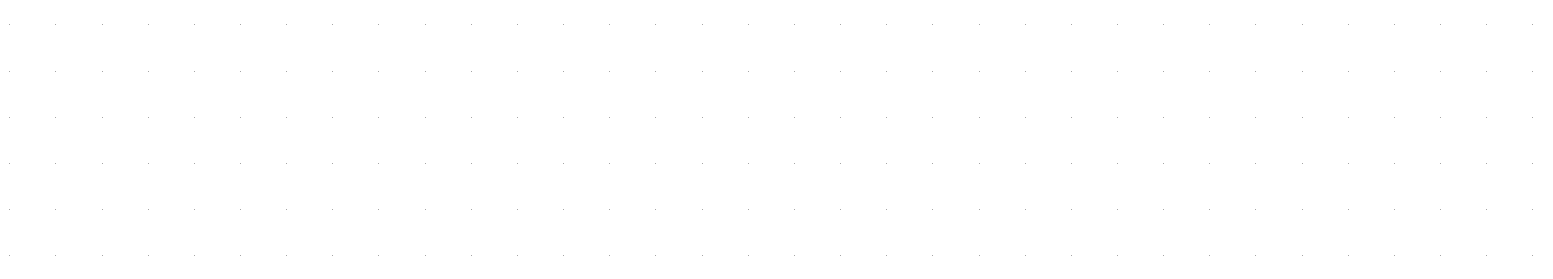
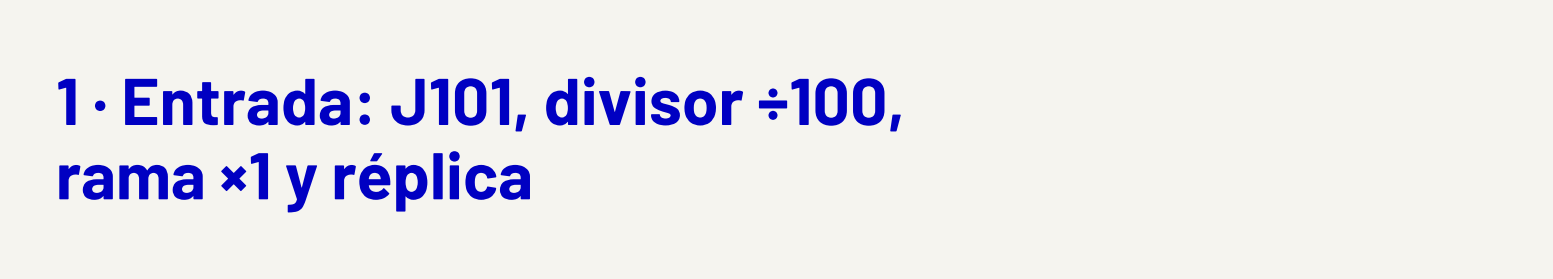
text: none -> 1 · Entrada: J101, divisor ÷100, (479, 104)
text: none -> rama ×1 y réplica (294, 181)

